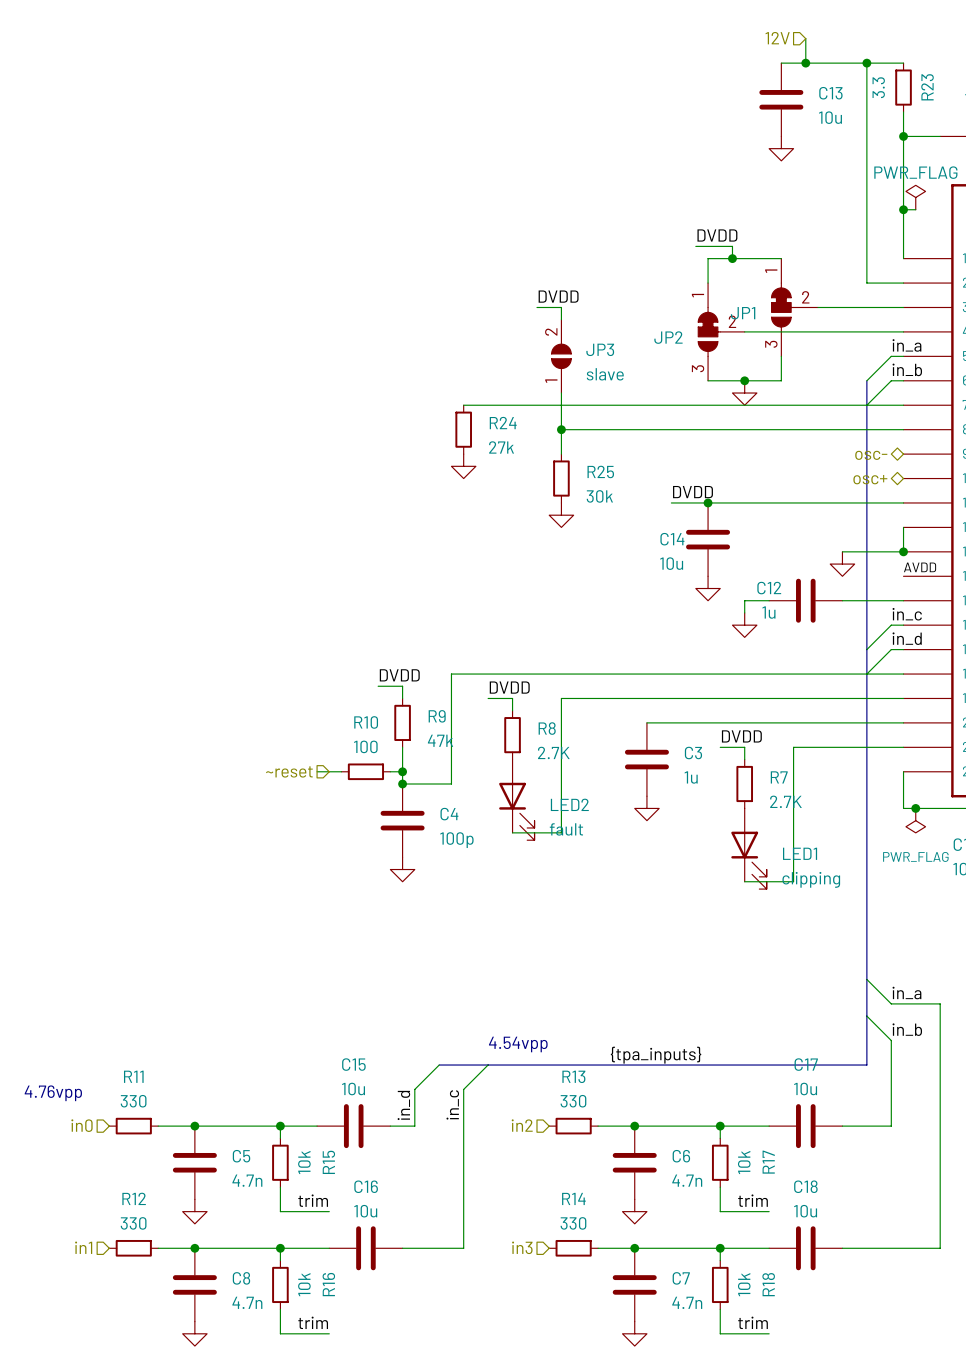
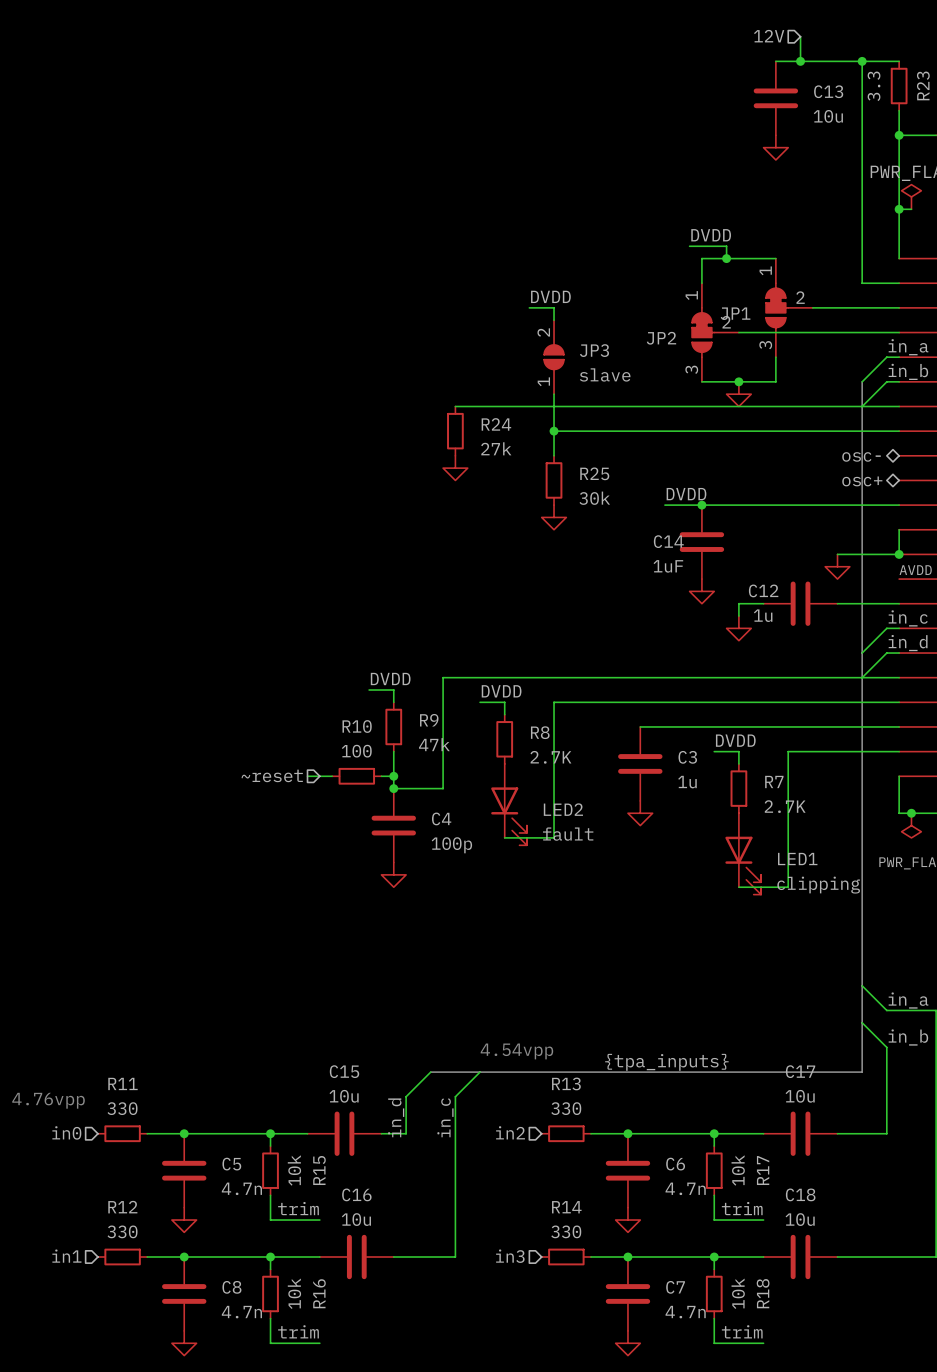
C14 value: 10u (671, 563) -> 1uF (668, 566)

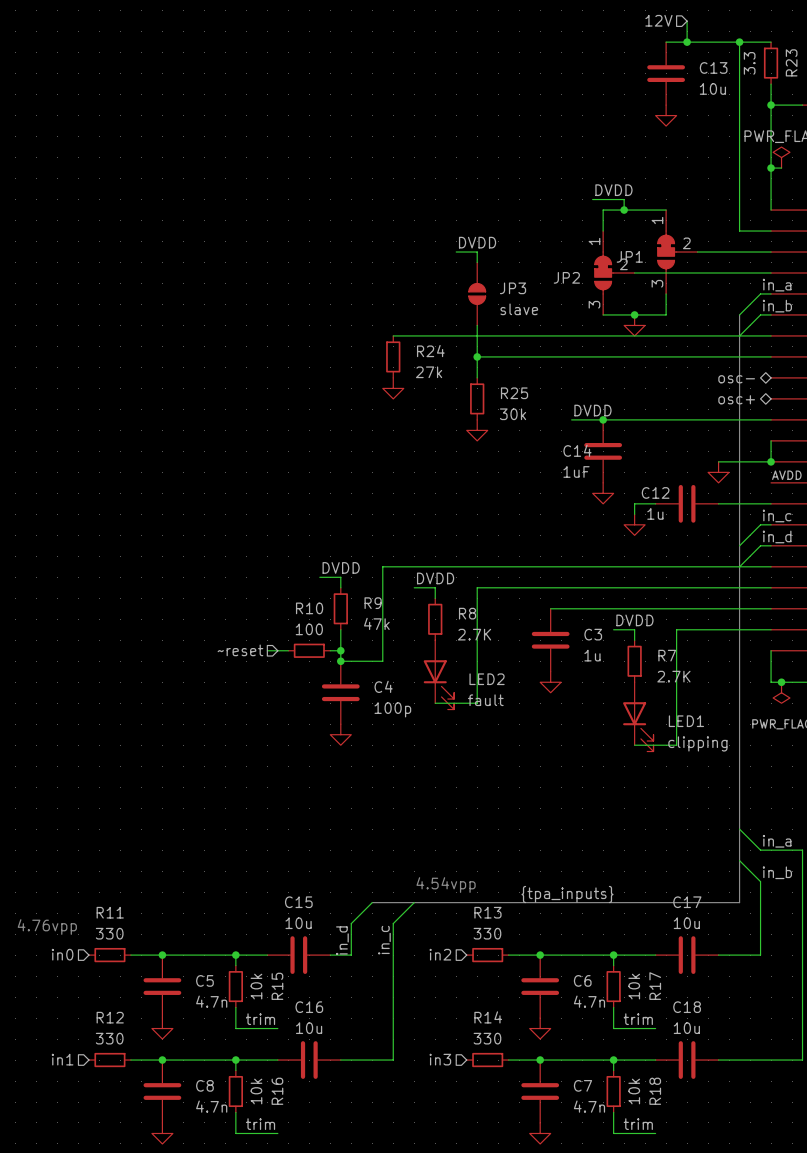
JP3 pin number: 2 (543, 332) -> none
JP3 pin number: 1 (543, 381) -> none

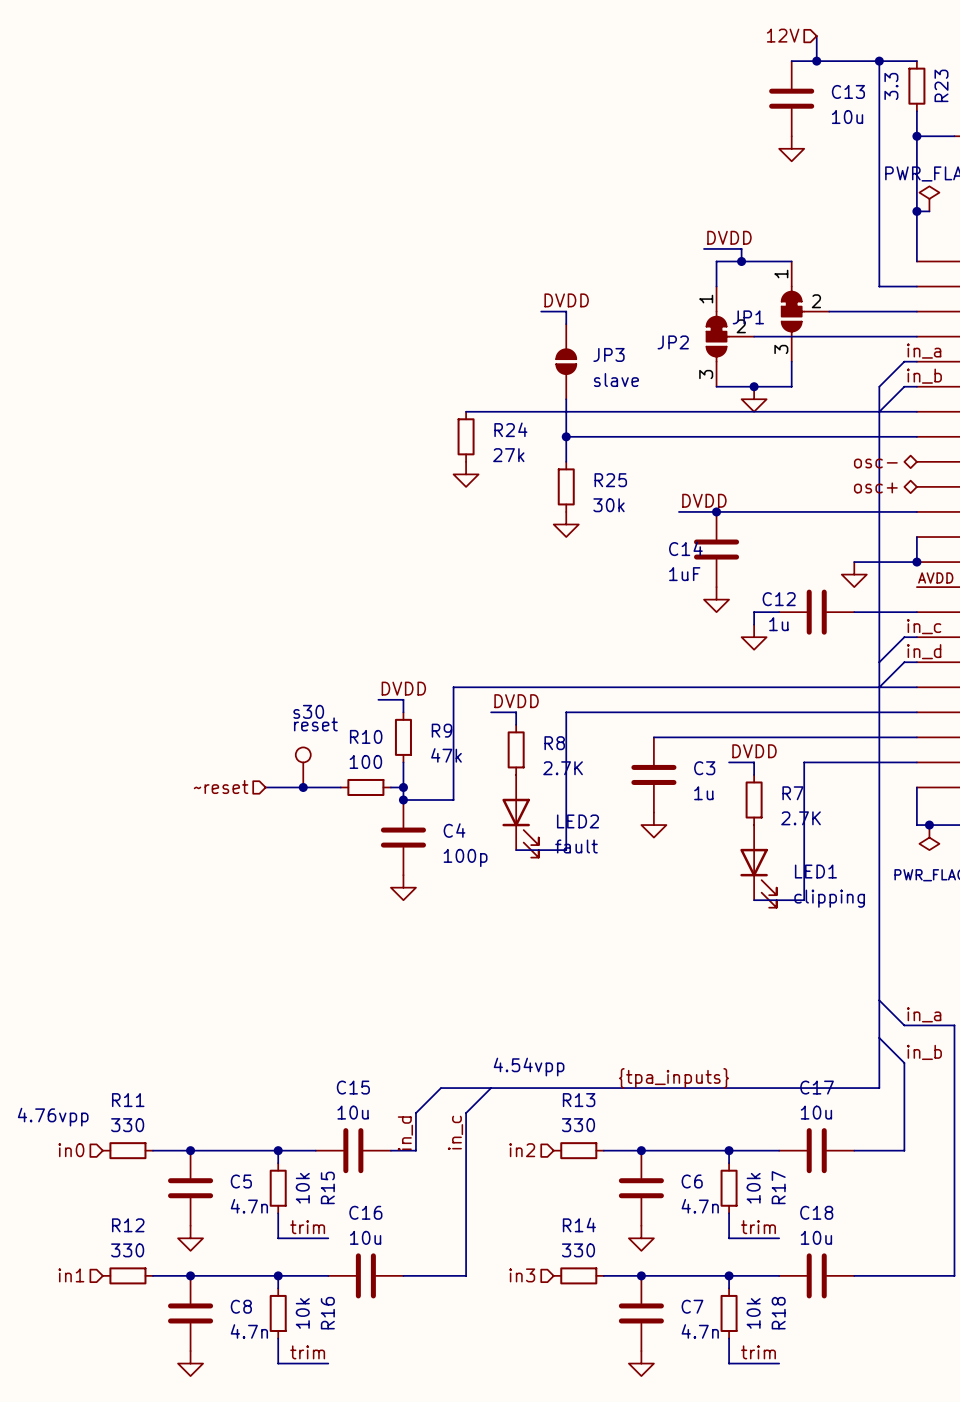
s30: none -> reset (303, 767)
wire: none -> (265, 787) (315, 787)
hierarchical label position: ~reset (240, 650) -> ~reset (221, 787)
junction: none -> (303, 787)

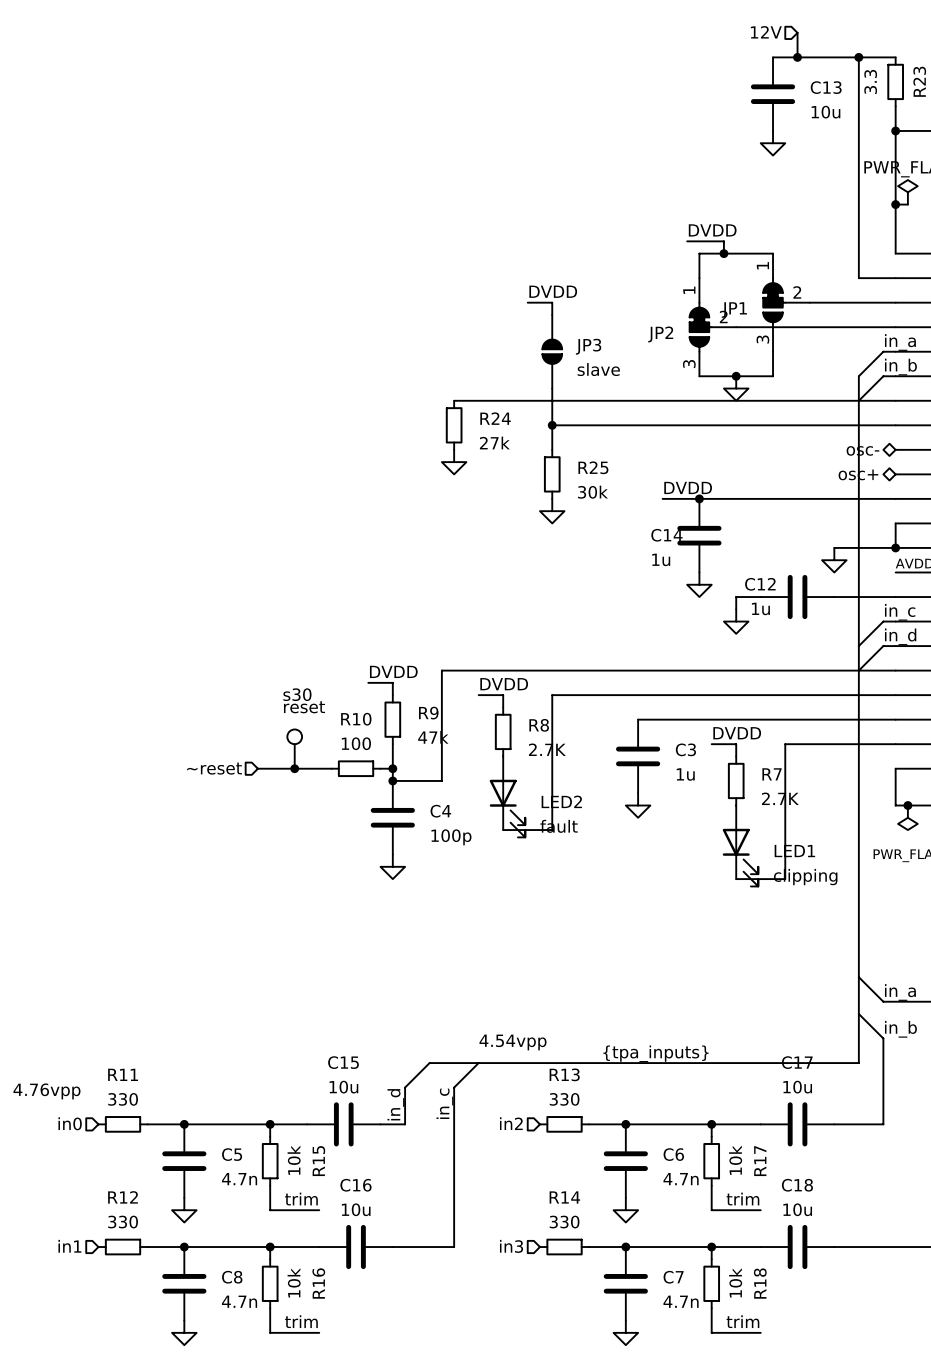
C14 value: 1uF (684, 574) -> 1u (661, 559)

